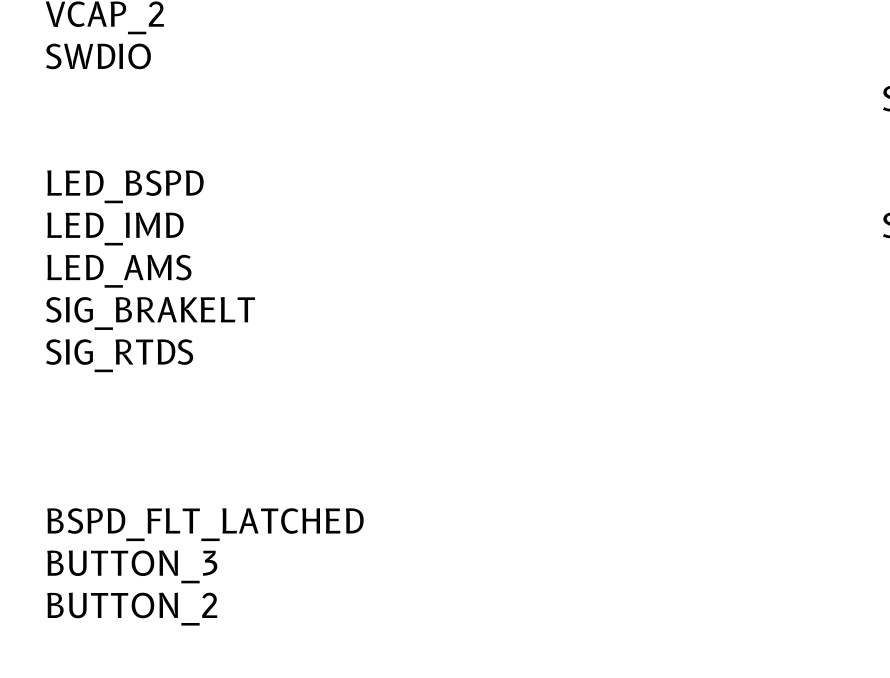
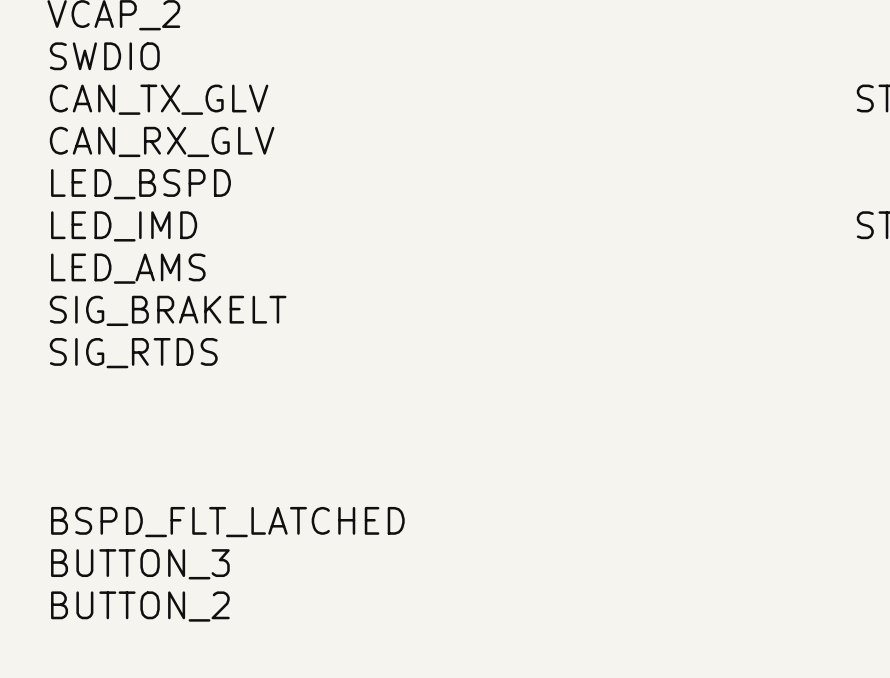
label: none -> CAN_TX_GLV (159, 99)
label: none -> CAN_RX_GLV (162, 141)

